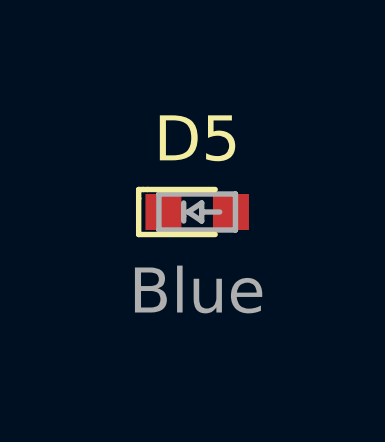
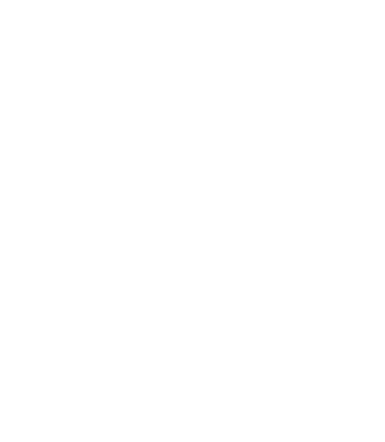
D5: Blue (192, 212) -> none

